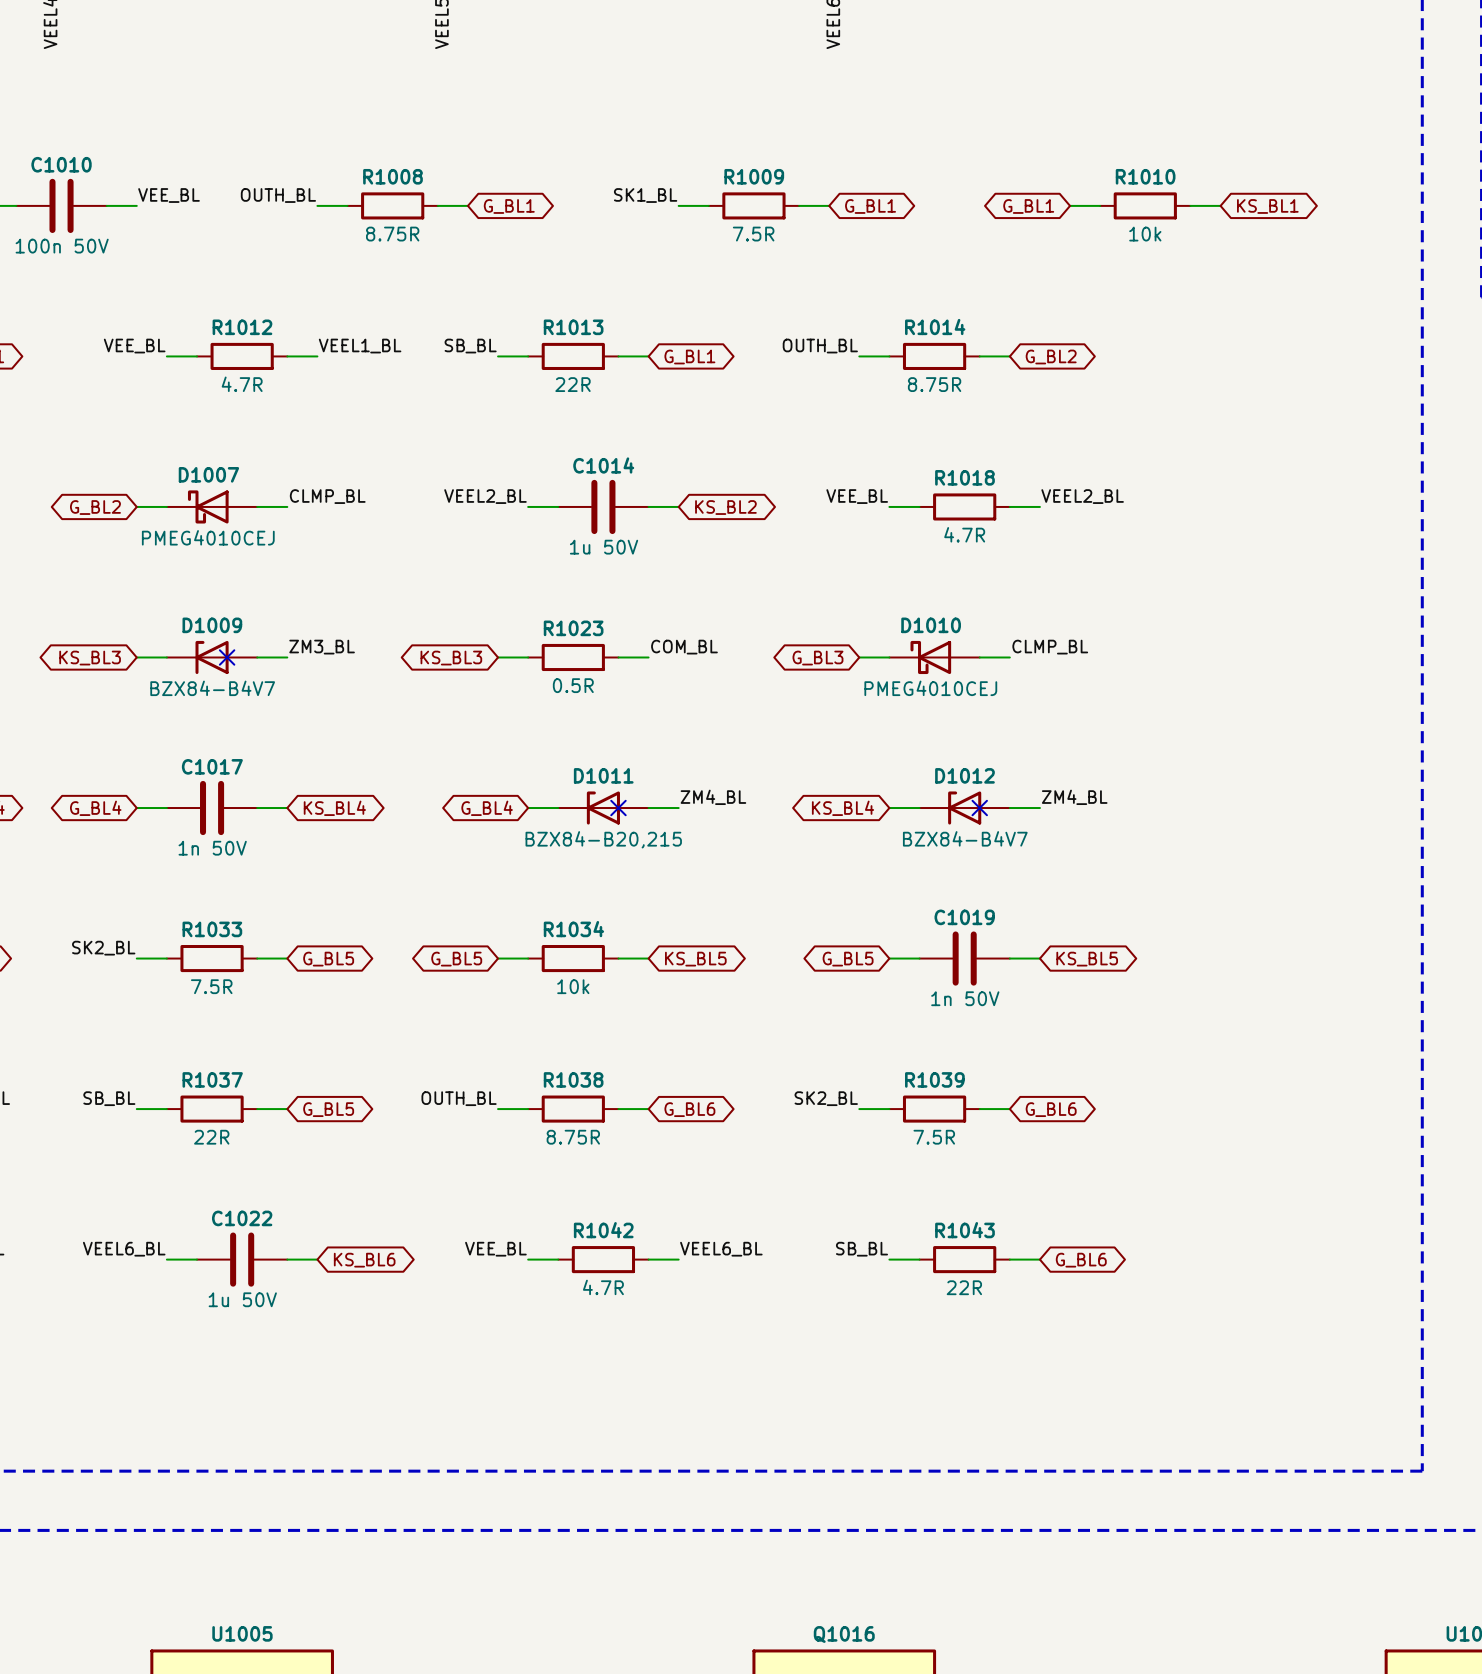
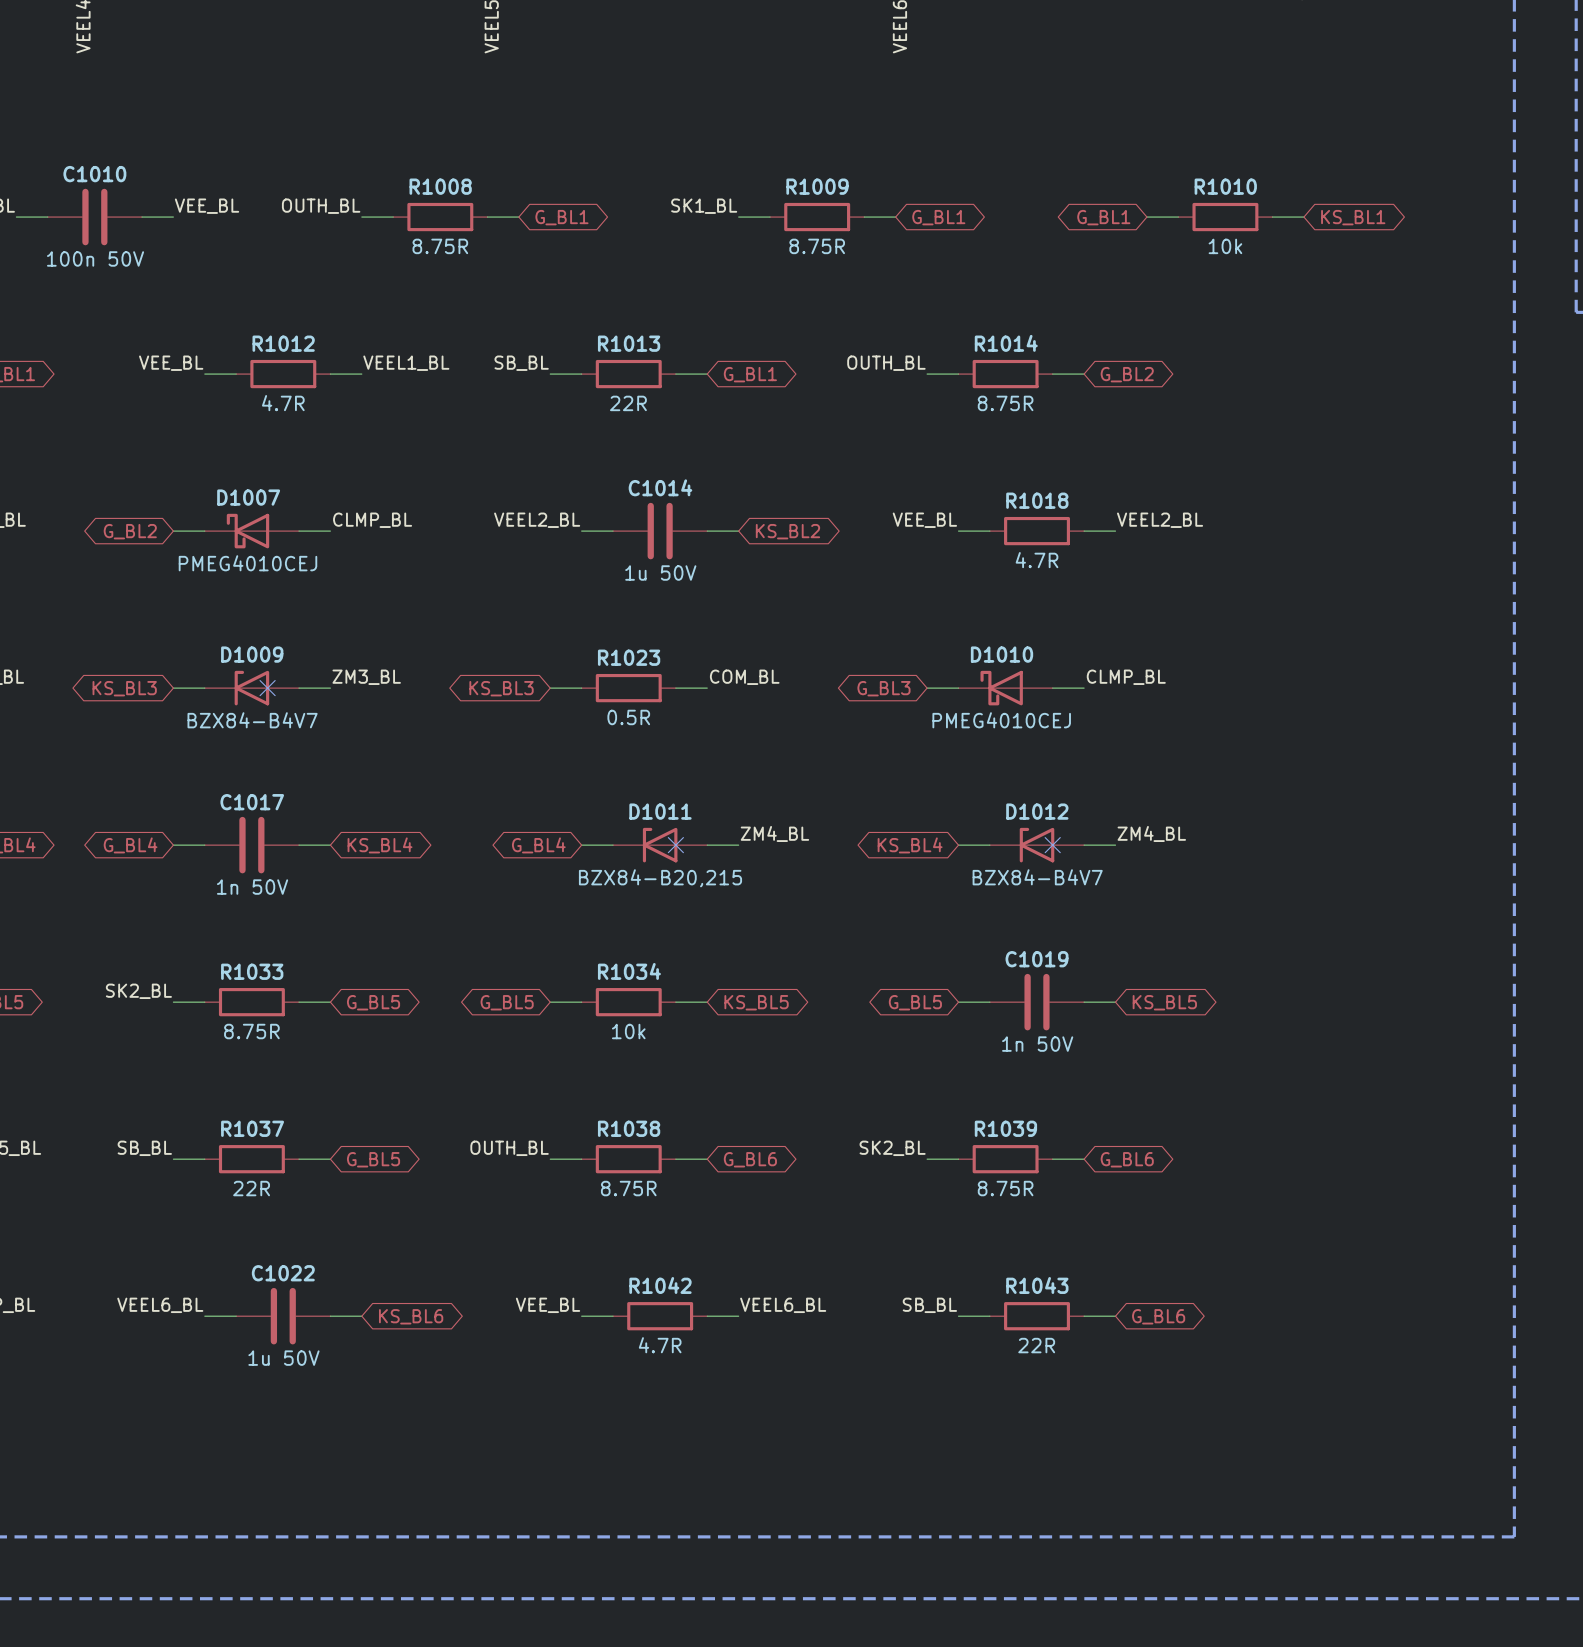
R1009 value: 7.5R (753, 234) -> 8.75R (817, 246)
R1033 value: 7.5R (211, 986) -> 8.75R (251, 1031)
R1039 value: 7.5R (934, 1137) -> 8.75R (1005, 1188)

